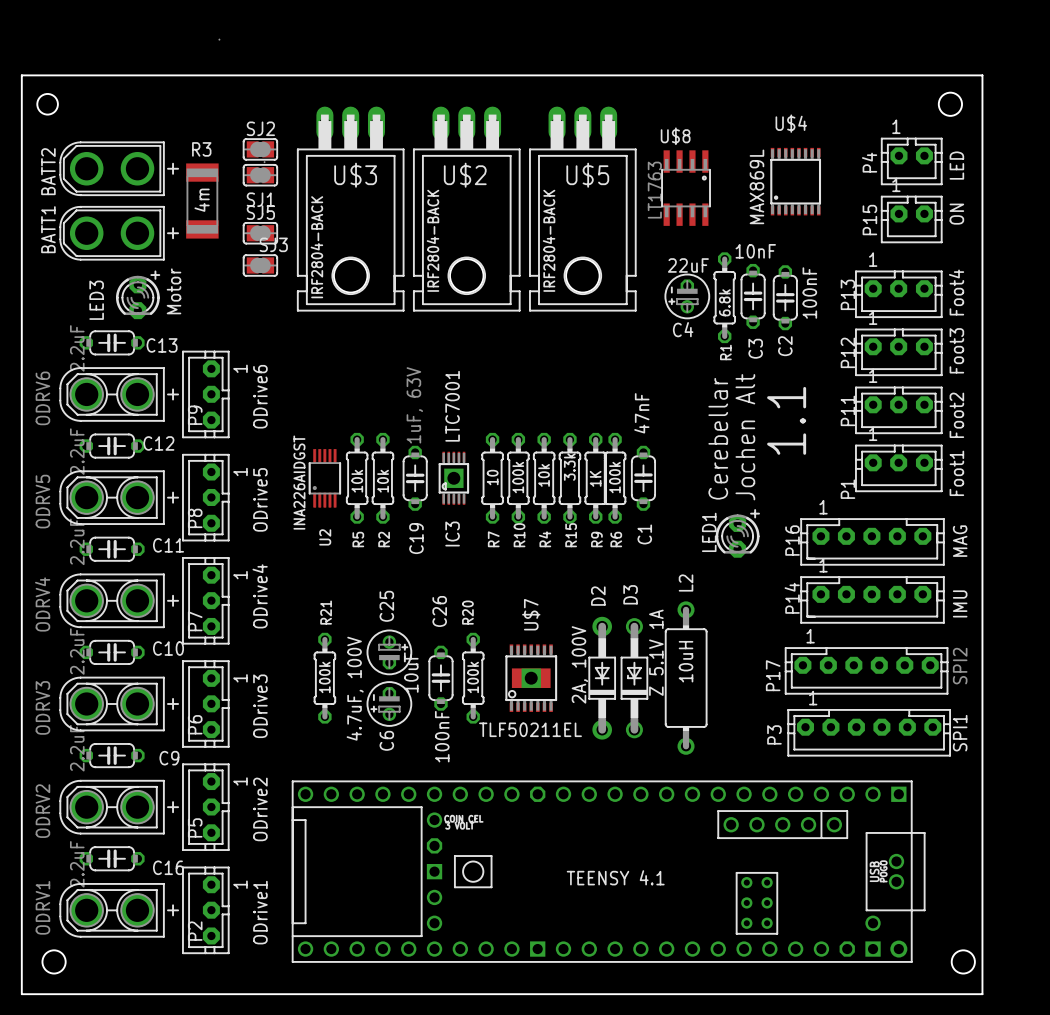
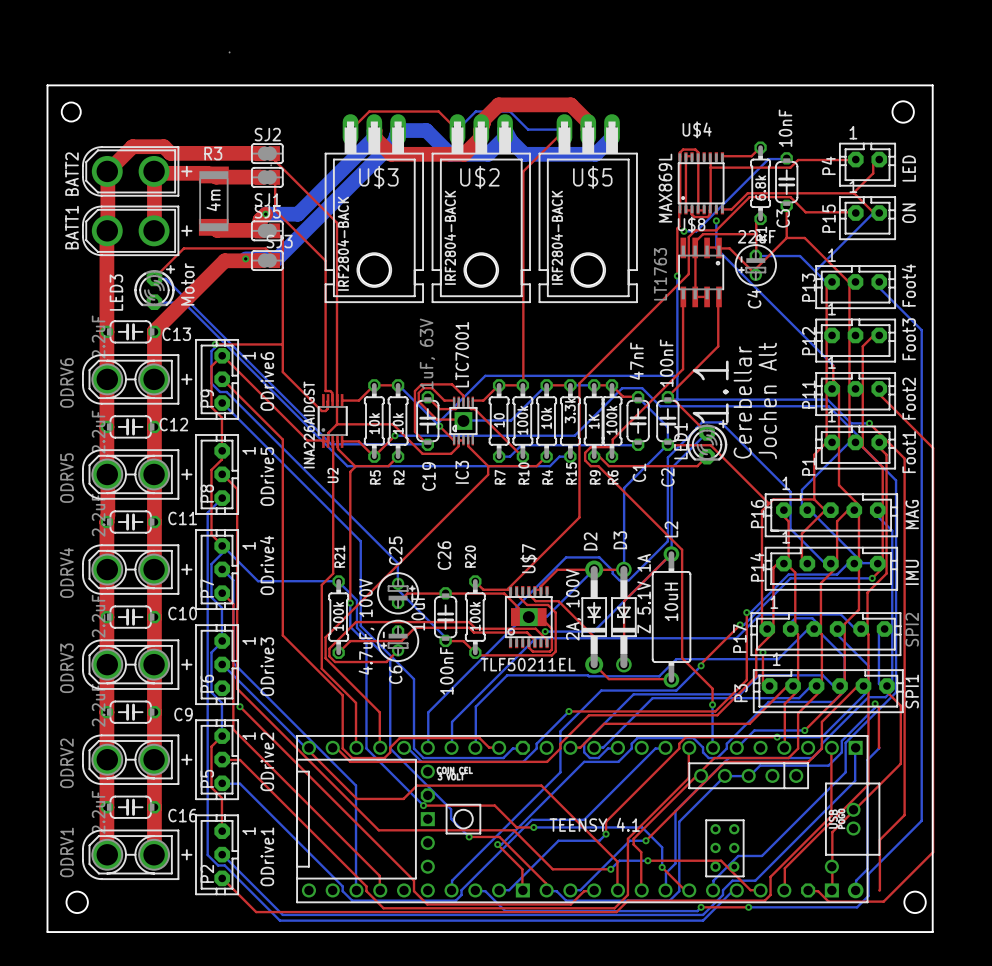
top track: none -> (350, 129) (369, 111) (438, 111) (457, 129)
top track: none -> (374, 129) (375, 138) (391, 154) (464, 154) (480, 138) (483, 120) (498, 104) (570, 104) (588, 121) (588, 129)
bottom track: none -> (374, 129) (374, 138) (298, 214) (265, 214)
bottom track: none -> (457, 129) (475, 111) (510, 111) (528, 129) (564, 129)
top track: none -> (564, 129) (523, 171) (523, 384) (498, 385) (483, 400) (472, 401)
bottom track: none -> (612, 129) (611, 138) (595, 154) (524, 154) (510, 141) (505, 129) (504, 138) (488, 154) (450, 154) (426, 130) (398, 129) (395, 140) (277, 258) (245, 258)
top track: none -> (760, 147) (751, 156) (722, 156)
top track: none -> (260, 153) (170, 153) (163, 146) (132, 146) (107, 171) (106, 522)
top track: none -> (274, 153) (275, 160) (337, 222) (337, 424)
top track: none -> (692, 156) (685, 156) (685, 210) (692, 210) (691, 214) (694, 217) (707, 217) (709, 215) (710, 156)
bottom track: none -> (786, 158) (768, 159) (696, 231) (684, 231)
top track: none -> (849, 159) (798, 160) (790, 167) (710, 167)
top track: none -> (873, 159) (873, 173) (854, 193)
top track: none -> (260, 177) (216, 177) (206, 173) (156, 173) (154, 171) (154, 230)
top track: none -> (274, 177) (275, 210) (325, 260) (325, 391) (332, 392) (332, 400)
U$4 position: (795, 181) -> (701, 183)
U$8 position: (686, 188) -> (701, 272)
U$8 value position: LT1763 (654, 190) -> LT1763 (660, 274)
top track: none -> (854, 193) (747, 193) (731, 209) (722, 210)
top track: none -> (854, 193) (873, 213)
top track: none -> (786, 205) (786, 237)
U$3 position: (350, 209) -> (374, 208)
U$2 position: (466, 209) -> (481, 208)
U$5 position: (582, 209) -> (588, 208)
top track: none -> (704, 210) (698, 210) (698, 152) (695, 149) (683, 149) (679, 156) (677, 276)
top track: none -> (849, 213) (805, 212) (790, 197) (749, 197) (716, 230) (695, 230) (688, 237) (688, 274) (579, 383) (579, 517) (508, 589)
bottom track: none -> (873, 213) (815, 271)
top track: none -> (265, 214) (259, 219) (260, 230) (217, 230) (213, 227)
via: none -> (265, 214)
top track: none -> (760, 218) (756, 222) (755, 255)
bottom track: none -> (716, 220) (716, 248) (833, 365)
via: none -> (716, 220)
top track: none -> (274, 230) (282, 238) (282, 372) (321, 411) (327, 409) (328, 400)
via: none -> (684, 231)
top track: none -> (756, 234) (703, 234) (695, 241) (695, 296) (707, 296)
top track: none -> (786, 237) (753, 271) (755, 274)
top track: none -> (786, 237) (804, 237) (849, 281) (849, 442)
top track: none -> (707, 247) (729, 248) (755, 274)
C3 value rotation: 0° (755, 251) -> 90° counterclockwise (785, 128)
bottom track: none -> (755, 255) (800, 256) (826, 281)
via: none -> (245, 258)
top track: none -> (260, 260) (224, 260) (154, 331) (154, 854)
top track: none -> (274, 260) (274, 256) (265, 248) (183, 248) (154, 278)
bottom track: none -> (677, 276) (677, 399)
via: none -> (677, 276)
bottom track: none -> (154, 278) (165, 278) (331, 444) (427, 444)
top track: none -> (826, 281) (826, 442) (814, 454) (814, 499)
bottom track: none -> (873, 281) (921, 330) (921, 820) (868, 874) (868, 895) (857, 907) (748, 907)
C2 value position: 100nF (809, 293) -> 100nF (666, 363)
C4 position: (687, 296) -> (755, 265)
C3 position: (753, 296) -> (786, 182)
R1 position: (724, 297) -> (760, 183)
C2 position: (785, 297) -> (667, 421)
top track: none -> (683, 296) (683, 369) (612, 439) (612, 456)
top track: none -> (718, 296) (718, 346) (667, 396) (669, 395) (707, 432)
bottom track: none -> (154, 302) (183, 302) (347, 466) (549, 466) (559, 456) (570, 456)
C4 name rotation: 0° (683, 329) -> 90° counterclockwise (754, 298)
C2 name position: C2 (785, 346) -> C2 (667, 477)
top track: none -> (873, 335) (862, 346) (862, 447) (882, 467) (882, 567) (872, 578)
C3 name position: C3 (755, 348) -> C3 (783, 218)
top track: none -> (215, 344) (282, 344)
bottom track: none -> (215, 344) (211, 351) (211, 383) (220, 392) (226, 392) (397, 563) (398, 590) (445, 637) (445, 640)
via: none -> (215, 344)
top track: none -> (833, 365) (833, 380) (839, 386) (839, 485) (858, 505) (858, 609) (844, 623) (844, 690) (804, 730)
bottom track: none -> (677, 375) (485, 375) (437, 423) (439, 426) (398, 385)
top track: none -> (222, 379) (282, 439) (282, 635) (342, 695) (342, 748) (352, 758) (384, 758) (390, 752) (390, 747) (399, 738) (479, 738) (489, 747) (499, 747)
top track: none -> (398, 385) (374, 385) (358, 400) (342, 400)
top track: none -> (546, 385) (570, 385)
bottom track: none -> (546, 385) (510, 420) (463, 421)
bottom track: none -> (570, 385) (594, 385)
top track: none -> (594, 385) (612, 385) (623, 396) (638, 397)
top track: none -> (873, 388) (933, 448) (933, 852) (883, 901) (828, 901) (818, 891) (808, 890)
top track: none -> (427, 397) (439, 409) (455, 409) (458, 406) (458, 401)
bottom track: none -> (638, 397) (667, 427) (667, 444) (624, 488) (623, 569)
bottom track: none -> (667, 397) (669, 399) (827, 399) (851, 423) (869, 423)
top track: none -> (454, 401) (444, 400) (432, 388) (423, 388) (418, 392) (418, 401) (436, 419) (463, 421)
top track: none -> (463, 401) (463, 395) (452, 384) (421, 384) (414, 391) (414, 431) (427, 444)
top track: none -> (468, 401) (468, 406) (474, 409) (522, 456)
bottom track: none -> (222, 403) (360, 541) (360, 625) (414, 679) (414, 748) (423, 758) (503, 758) (512, 748) (522, 747)
text position: 1.1 (786, 420) -> 1.1 (710, 391)
text position: Jochen Alt (745, 437) -> Jochen Alt (767, 400)
text position: Cerebellar (718, 438) -> Cerebellar (742, 402)
top track: none -> (869, 423) (904, 458) (904, 815) (879, 839) (879, 890)
via: none -> (869, 423)
top track: none -> (337, 424) (328, 432) (327, 441) (307, 440) (222, 355) (211, 366) (211, 407) (221, 417) (222, 450) (221, 459) (211, 469) (211, 534) (222, 545)
top track: none -> (337, 424) (393, 424) (422, 453) (451, 453) (458, 446) (458, 440) (463, 440)
top track: none -> (439, 426) (454, 440)
via: none -> (439, 426)
bottom track: none -> (707, 432) (671, 468) (671, 554) (593, 631) (545, 631)
top track: none -> (394, 435) (374, 456) (358, 441) (342, 441)
bottom track: none -> (394, 435) (574, 435) (622, 388) (642, 388) (660, 406) (828, 406) (860, 438) (860, 445) (896, 480) (896, 692) (845, 742) (845, 772) (761, 855) (738, 855) (713, 880) (713, 890)
via: none -> (394, 435)
top track: none -> (332, 441) (333, 573) (321, 585) (321, 668) (356, 702) (356, 747)
top track: none -> (337, 441) (337, 449) (355, 466)
top track: none -> (468, 440) (468, 446) (488, 466)
bottom track: none -> (849, 442) (801, 489) (801, 510) (809, 509) (862, 563) (871, 563)
top track: none -> (873, 442) (886, 454) (886, 573) (867, 592) (868, 784) (784, 868) (784, 890)
bottom track: none -> (638, 444) (521, 445) (510, 456) (499, 456)
top track: none -> (667, 444) (710, 445) (769, 503)
top track: none -> (612, 447) (590, 447) (585, 452) (585, 460) (590, 466) (598, 466) (682, 549) (682, 658) (712, 688) (712, 704)
U2 position: (324, 478) -> (332, 421)
R5 position: (357, 478) -> (374, 421)
R2 position: (382, 478) -> (398, 421)
top track: none -> (398, 456) (388, 466) (355, 466)
C19 position: (415, 478) -> (427, 421)
IC3 position: (453, 478) -> (463, 421)
R7 position: (492, 478) -> (499, 421)
R10 position: (518, 478) -> (522, 421)
R4 position: (544, 478) -> (546, 421)
top track: none -> (546, 456) (536, 466) (488, 466)
R15 position: (569, 478) -> (570, 421)
R9 position: (595, 478) -> (594, 421)
top track: none -> (594, 456) (599, 456) (608, 466) (697, 466) (707, 456)
R6 position: (615, 478) -> (612, 421)
C1 position: (643, 478) -> (638, 421)
top track: none -> (355, 466) (350, 471) (350, 603)
top track: none -> (488, 466) (488, 474) (325, 637) (325, 658) (379, 712) (380, 747)
top track: none -> (222, 474) (237, 488) (237, 688) (378, 830) (513, 830) (552, 869) (610, 869)
bottom track: none -> (222, 498) (207, 512) (207, 855) (218, 865) (224, 865) (279, 920) (703, 920) (732, 891) (736, 890)
top track: none -> (814, 499) (773, 499) (761, 510) (761, 628)
top track: none -> (814, 499) (824, 510) (801, 533) (801, 563)
LED1 position: (737, 533) -> (707, 442)
top track: none -> (777, 510) (788, 521) (788, 565) (795, 572) (795, 631) (798, 634) (798, 690) (784, 703) (784, 747)
top track: none -> (848, 510) (837, 521) (837, 566) (820, 583) (821, 689) (798, 713) (798, 748) (788, 758) (714, 758) (633, 838) (633, 844) (641, 852) (641, 890)
bottom track: none -> (871, 510) (892, 530) (892, 690) (885, 697) (868, 697) (821, 743) (821, 748) (812, 758) (728, 758) (675, 811) (675, 863) (665, 873) (665, 890)
top track: none -> (106, 522) (107, 854)
top track: none -> (671, 554) (624, 601) (623, 664)
top track: none -> (777, 563) (773, 567) (773, 632) (756, 649) (756, 676) (717, 715) (588, 715) (560, 743) (560, 748) (547, 761) (350, 761) (337, 748) (332, 747)
bottom track: none -> (824, 563) (790, 528) (790, 491) (721, 422) (702, 422) (667, 457) (667, 541) (628, 580) (619, 580) (599, 557) (566, 557) (516, 606) (516, 623) (428, 712) (427, 747)
bottom track: none -> (848, 563) (837, 574) (788, 574) (750, 612) (746, 612)
bottom track: none -> (222, 569) (233, 580) (233, 662) (356, 785) (356, 890)
bottom track: none -> (594, 569) (547, 616) (528, 617)
top track: none -> (623, 569) (557, 569) (540, 586) (540, 590) (534, 590)
bottom track: none -> (872, 578) (790, 578) (743, 624) (740, 624)
via: none -> (872, 578)
top track: none -> (475, 581) (483, 589) (510, 590)
top track: none -> (516, 590) (516, 594) (527, 604) (548, 604) (555, 612) (555, 651) (551, 655) (477, 655) (463, 641) (445, 640)
top track: none -> (528, 590) (529, 594) (535, 601) (558, 601) (593, 636) (593, 663) (608, 679) (671, 679)
top track: none -> (222, 593) (233, 604) (233, 729) (379, 875) (380, 890)
top track: none -> (398, 602) (407, 593) (504, 593) (528, 617) (540, 617) (551, 628) (551, 649) (549, 651) (532, 651) (529, 647) (528, 644)
bottom track: none -> (350, 603) (350, 626) (366, 643) (366, 748) (423, 805)
via: none -> (350, 603)
top track: none -> (746, 612) (746, 680) (715, 711) (568, 711)
via: none -> (746, 612)
C25 position: (389, 652) -> (398, 593)
top track: none -> (740, 624) (701, 665)
via: none -> (740, 624)
bottom track: none -> (784, 628) (795, 618) (812, 618) (819, 624) (819, 631) (844, 657) (844, 690) (833, 701) (768, 701) (726, 743) (726, 748) (717, 758) (708, 758) (703, 752) (703, 747) (693, 738) (637, 738) (631, 743) (631, 748) (618, 761) (584, 761) (501, 844) (497, 844)
bottom track: none -> (808, 628) (778, 659) (676, 659) (659, 676) (507, 675) (475, 706) (475, 747)
bottom track: none -> (831, 628) (868, 665) (868, 690) (821, 737) (777, 737)
bottom track: none -> (855, 628) (840, 614) (760, 614) (736, 638) (535, 638) (452, 721) (451, 747)
bottom track: none -> (878, 628) (878, 683) (881, 686)
via: none -> (545, 631)
R21 position: (324, 678) -> (338, 617)
C26 position: (440, 678) -> (445, 617)
R20 position: (473, 678) -> (475, 617)
U$7 position: (531, 678) -> (528, 617)
D2 position: (602, 678) -> (594, 617)
D3 position: (634, 678) -> (623, 617)
L2 position: (686, 678) -> (671, 616)
top track: none -> (534, 643) (534, 640) (527, 632) (473, 632) (469, 627) (414, 627) (401, 641) (350, 641) (338, 652)
top track: none -> (547, 644) (546, 639) (535, 628) (475, 628) (469, 622) (356, 622) (329, 648) (329, 656) (335, 662) (386, 662) (398, 650)
top track: none -> (762, 652) (763, 686)
via: none -> (762, 652)
bottom track: none -> (222, 664) (304, 746)
C6 position: (389, 703) -> (398, 640)
bottom track: none -> (701, 665) (676, 690) (601, 690) (560, 731) (560, 772) (452, 880) (451, 890)
via: none -> (701, 665)
top track: none -> (787, 686) (749, 723) (604, 723) (580, 747) (570, 747)
bottom track: none -> (810, 686) (799, 698) (652, 698) (603, 747) (594, 747)
bottom track: none -> (834, 686) (822, 675) (759, 675) (740, 694) (633, 694) (584, 743) (584, 752) (589, 758) (598, 758) (607, 748) (617, 747)
top track: none -> (857, 686) (821, 721) (821, 748) (808, 761) (724, 761) (646, 840)
top track: none -> (881, 686) (900, 705) (900, 763) (832, 832) (831, 890)
top track: none -> (875, 703) (878, 707) (879, 747)
bottom track: none -> (875, 703) (875, 707) (841, 740) (841, 752) (828, 765) (760, 765) (749, 776) (724, 775) (679, 821) (679, 891) (669, 900) (566, 900) (556, 891) (546, 890)
via: none -> (875, 703)
bottom track: none -> (712, 704) (713, 747)
via: none -> (712, 704)
top track: none -> (240, 706) (414, 880) (414, 891) (427, 904) (570, 904) (584, 891) (594, 890)
via: none -> (240, 706)
bottom track: none -> (568, 711) (536, 743) (536, 748) (523, 761) (421, 761) (408, 748) (404, 747)
via: none -> (568, 711)
bottom track: none -> (804, 730) (754, 730) (736, 747)
via: none -> (804, 730)
top track: none -> (222, 736) (211, 746) (211, 787) (221, 797) (222, 831)
bottom track: none -> (222, 736) (221, 702) (211, 692) (211, 652) (222, 641) (221, 607) (211, 597) (211, 564) (225, 549) (222, 545) (258, 581) (337, 581) (356, 600) (356, 627) (390, 661) (390, 748) (451, 809) (451, 818) (469, 836)
top track: none -> (777, 737) (685, 737) (679, 743) (679, 748) (606, 821) (606, 834)
via: none -> (777, 737)
top track: none -> (304, 746) (356, 798) (403, 798) (416, 785) (541, 785) (617, 861) (617, 890)
bottom track: none -> (665, 747) (655, 748) (584, 819) (531, 819) (461, 890) (461, 894) (455, 900) (352, 900) (342, 891) (342, 886) (240, 783) (222, 783)
top track: none -> (689, 747) (688, 778) (627, 838) (627, 894) (614, 908) (383, 908) (366, 891) (366, 886) (240, 759) (222, 759)
top track: none -> (831, 747) (831, 816) (770, 876) (770, 894) (764, 900) (627, 900) (616, 912) (256, 912) (222, 878)
bottom track: none -> (855, 747) (855, 780) (755, 880) (732, 880) (723, 890) (723, 894) (703, 914) (282, 914) (222, 854)
bottom track: none -> (879, 747) (867, 759) (867, 869) (856, 880) (855, 890)
top track: none -> (423, 805) (494, 805) (516, 827) (533, 827)
via: none -> (423, 805)
bottom track: none -> (533, 827) (642, 827) (662, 847) (662, 867)
via: none -> (533, 827)
bottom track: none -> (606, 834) (599, 840) (558, 840) (509, 890) (499, 890)
via: none -> (606, 834)
top track: none -> (469, 836) (499, 836) (546, 883) (546, 890)
via: none -> (469, 836)
bottom track: none -> (646, 840) (629, 840) (580, 890) (570, 890)
via: none -> (646, 840)
top track: none -> (497, 844) (522, 869) (522, 890)
via: none -> (497, 844)
top track: none -> (647, 860) (721, 860) (750, 890) (760, 890)
bottom track: none -> (647, 860) (619, 860) (610, 869)
via: none -> (647, 860)
top track: none -> (662, 867) (684, 890) (689, 890)
via: none -> (662, 867)
via: none -> (610, 869)
bottom track: none -> (475, 890) (485, 891) (505, 911) (697, 911) (701, 907)
top track: none -> (701, 907) (748, 907)
via: none -> (701, 907)
via: none -> (748, 907)

